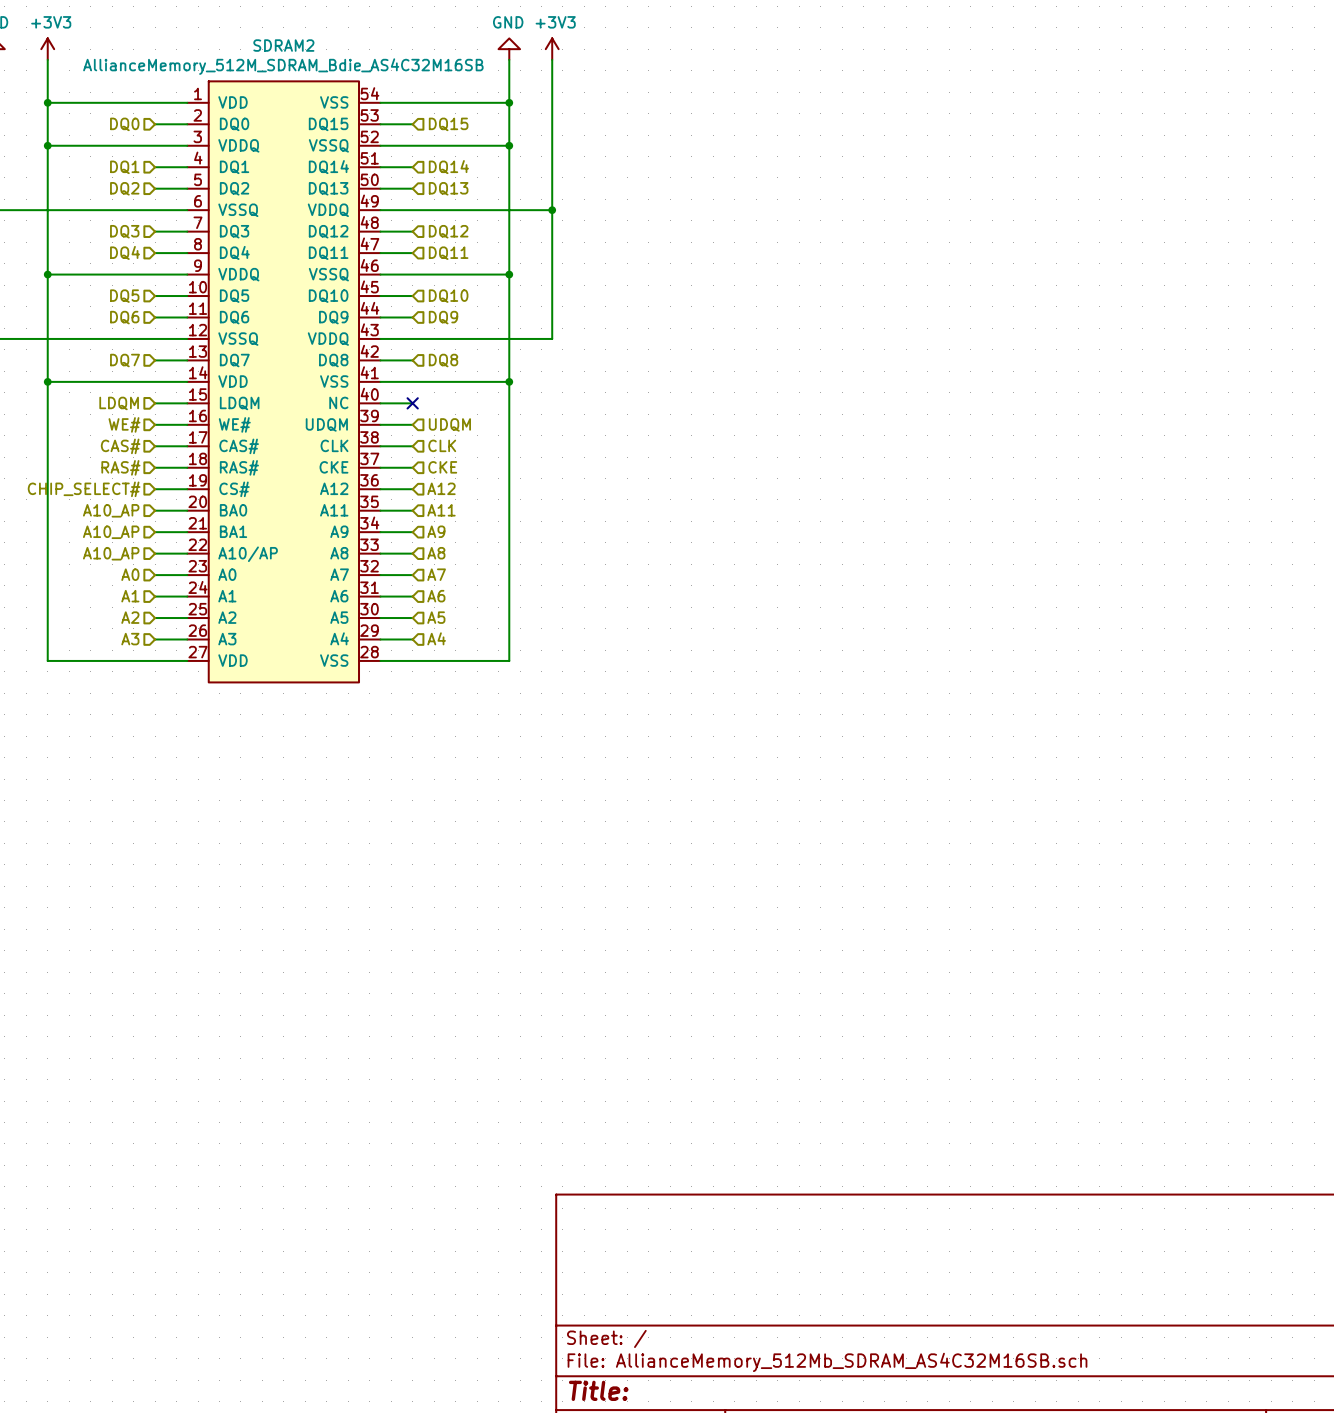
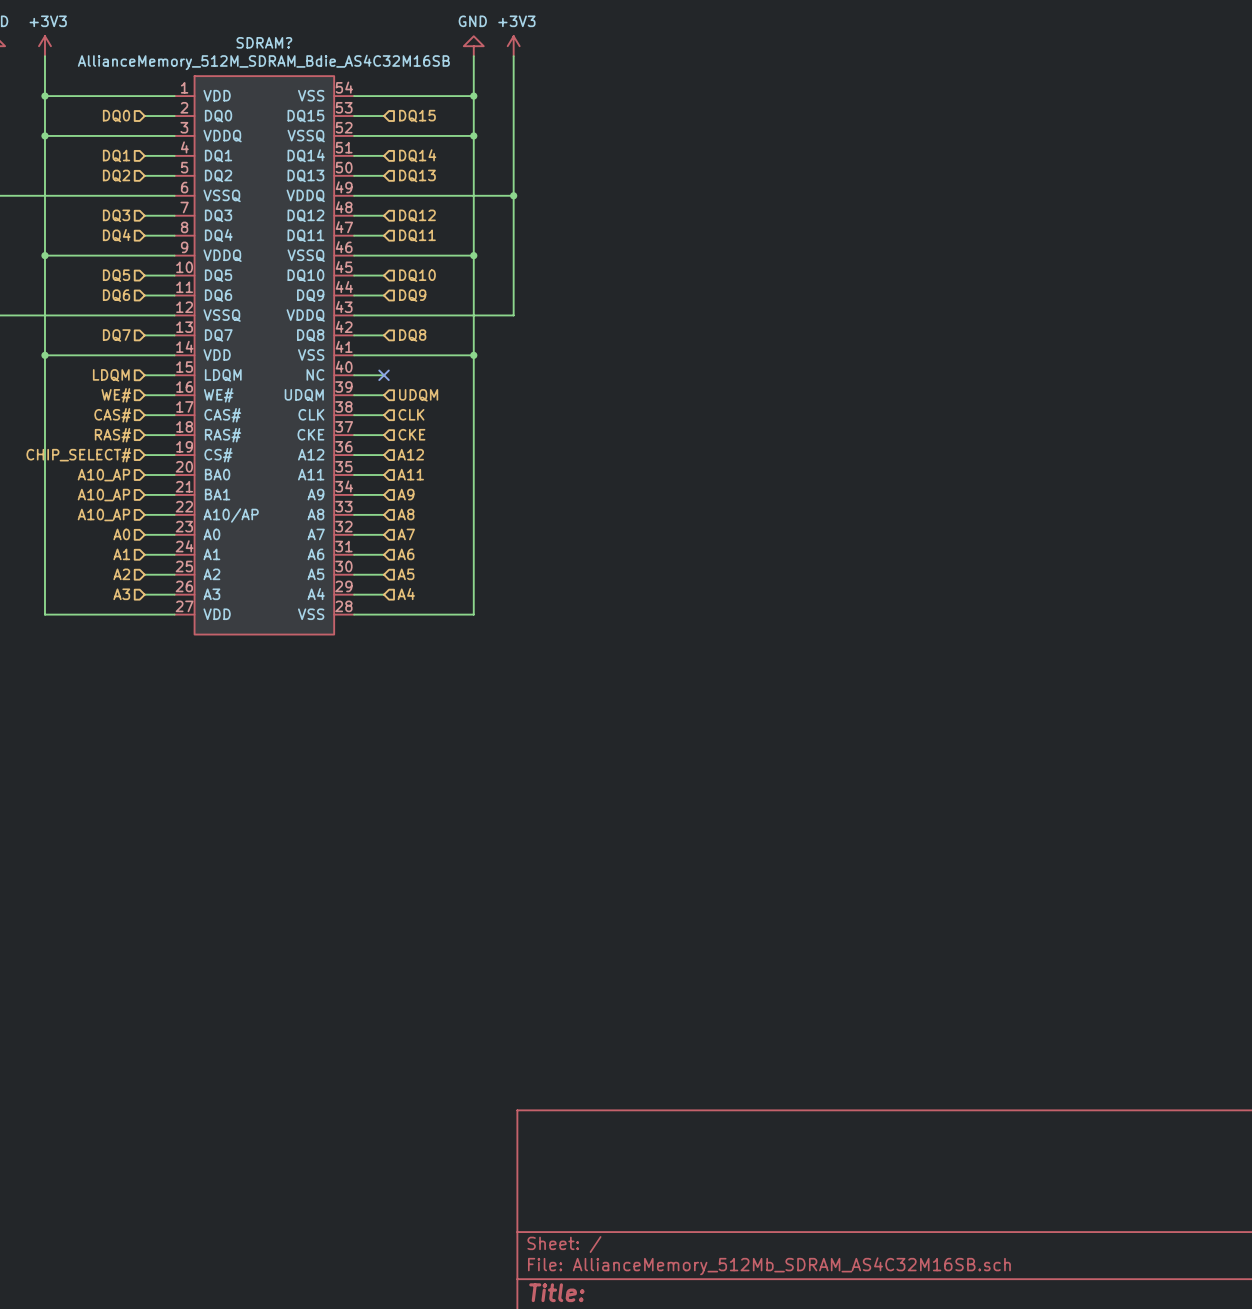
SDRAM2 name: SDRAM2 (283, 45) -> SDRAM? (264, 42)

